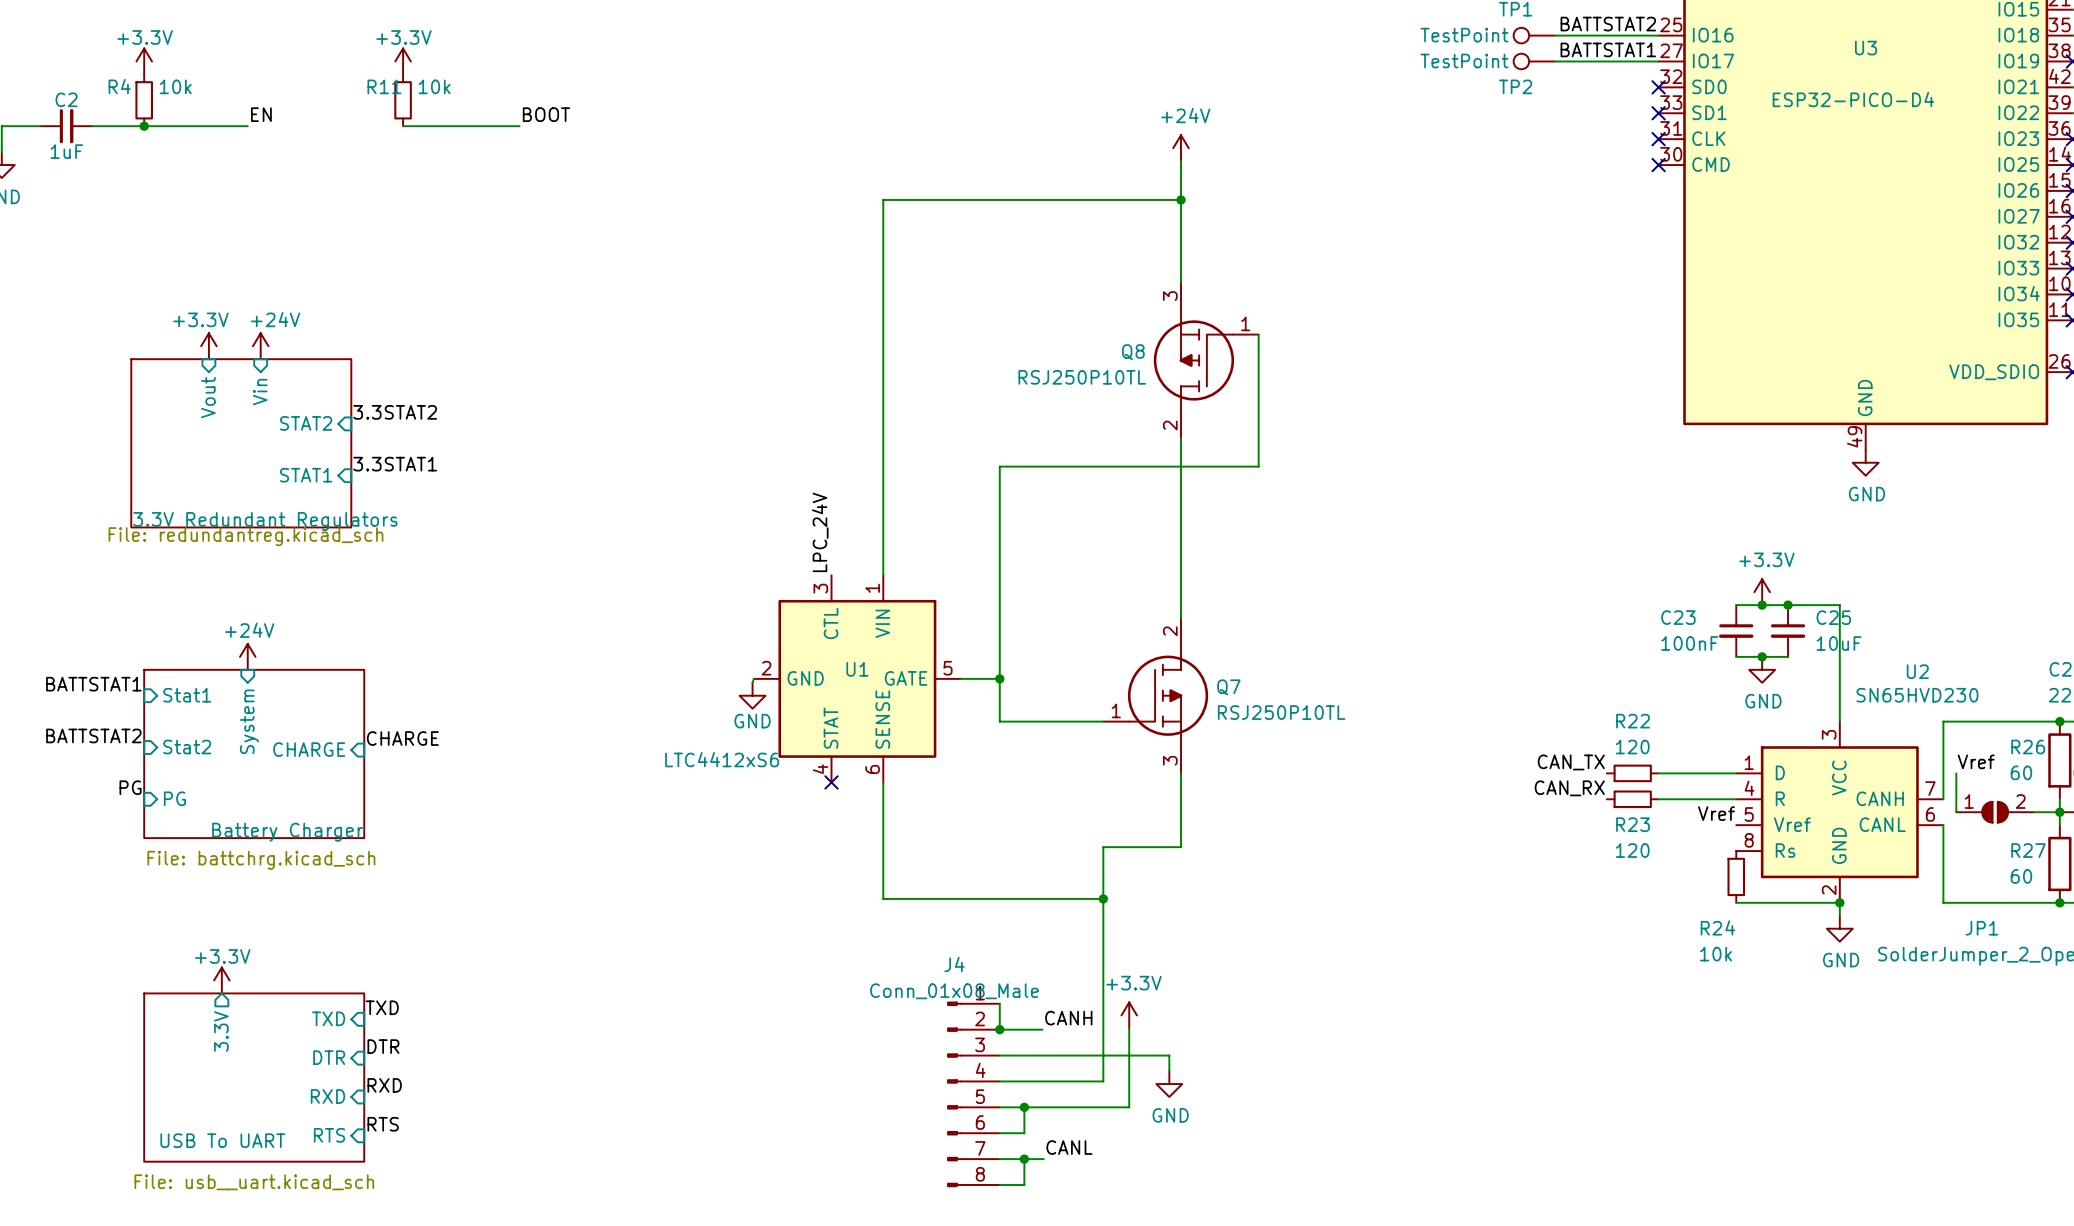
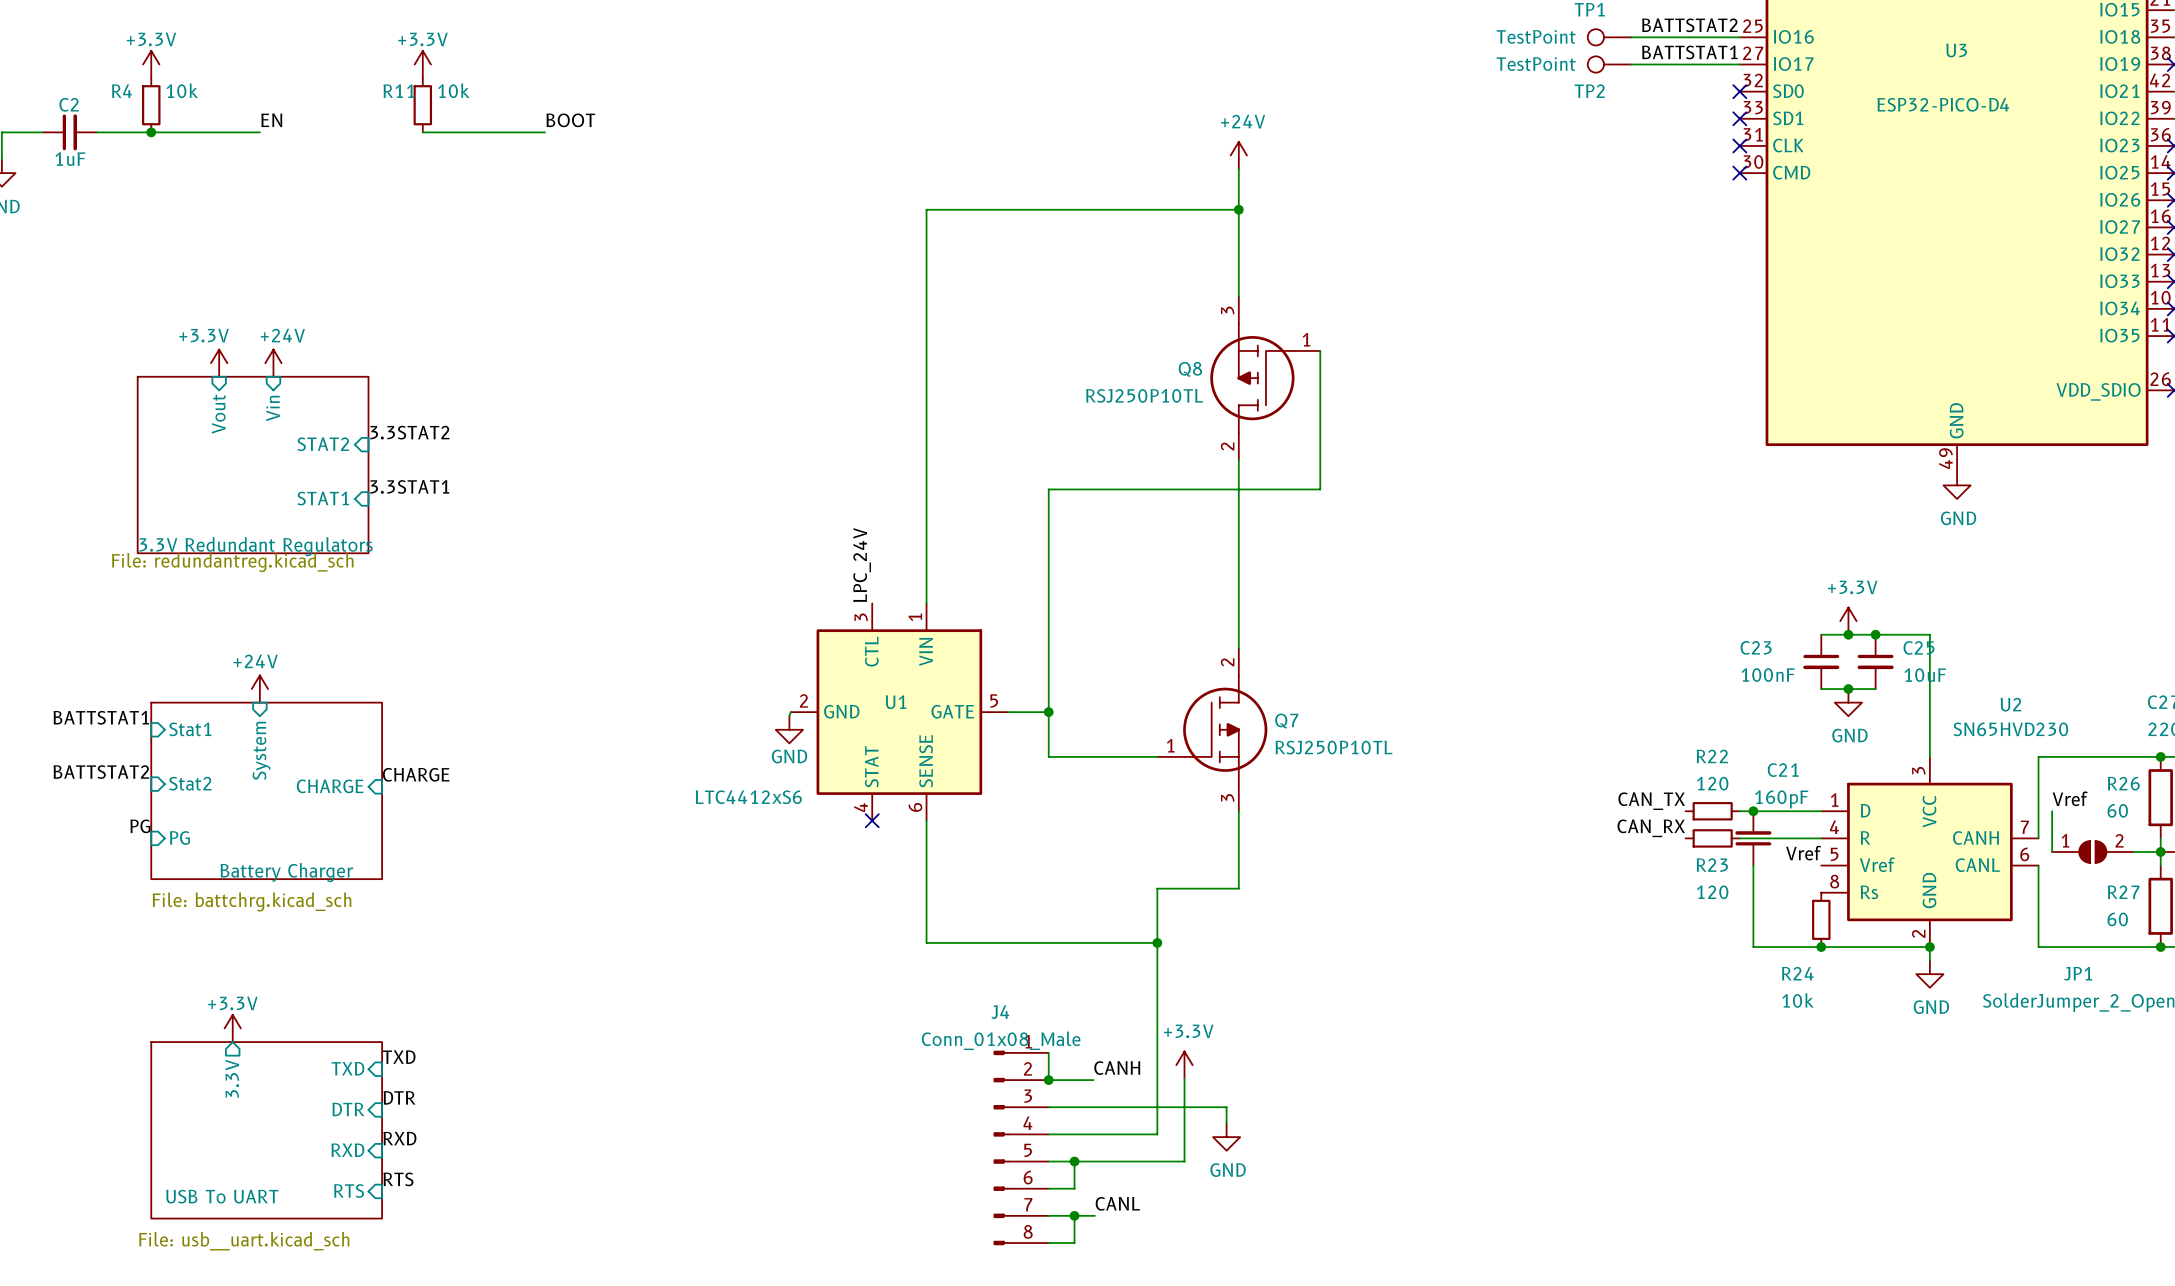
junction: none -> (1753, 811)
C21: none -> 160pF (1753, 838)
wire: none -> (1753, 865) (1753, 947) (1821, 947)
junction: none -> (1821, 947)

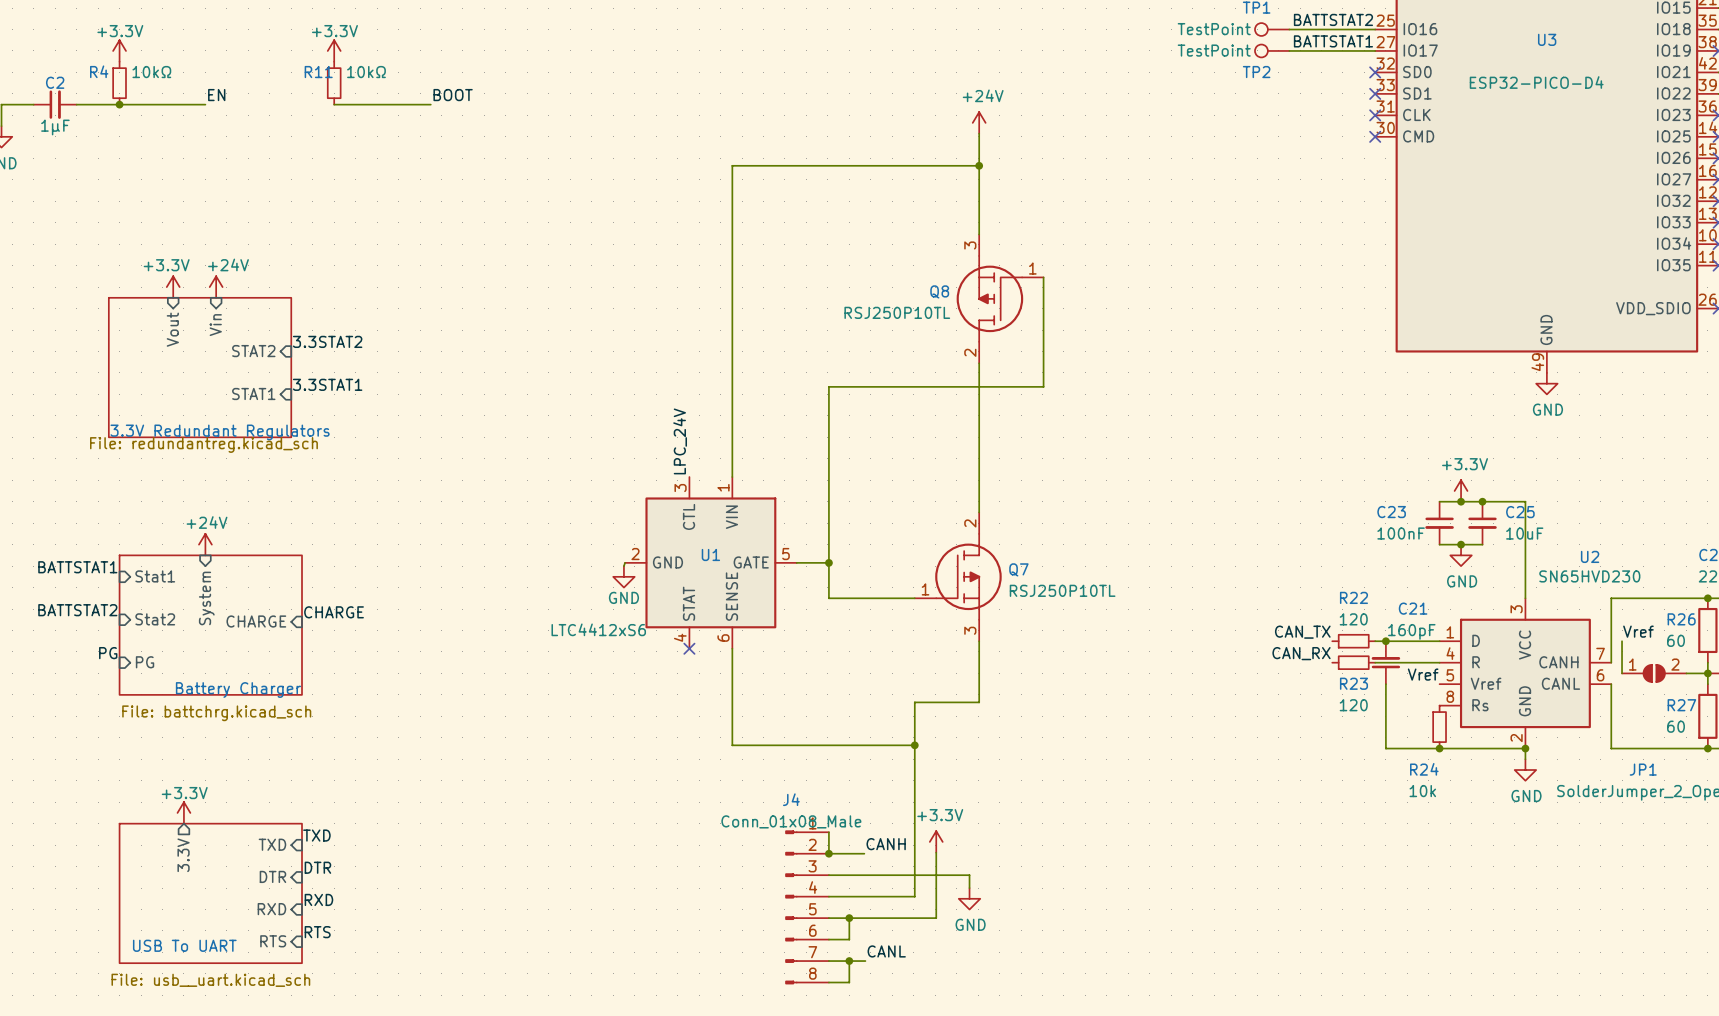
R4 value: 10k (182, 90) -> 10kΩ (151, 72)
R11 value: 10k (453, 90) -> 10kΩ (366, 72)
C2 value: 1uF (70, 159) -> 1μF (55, 127)

